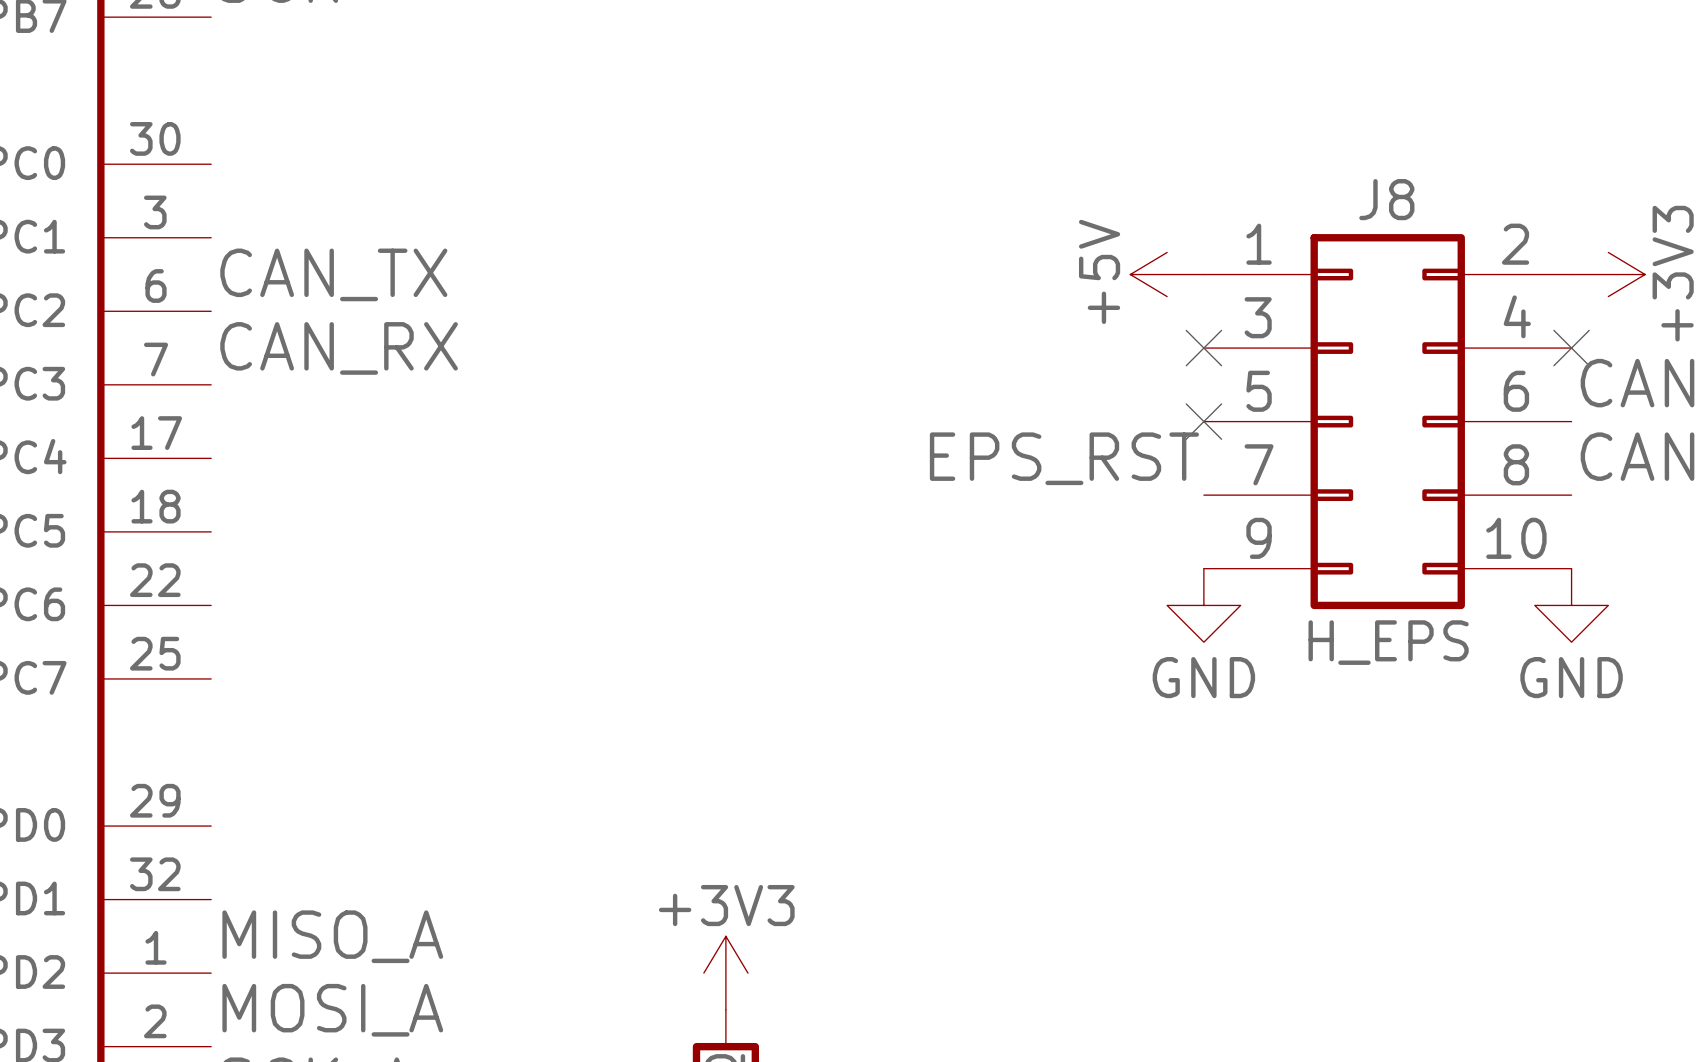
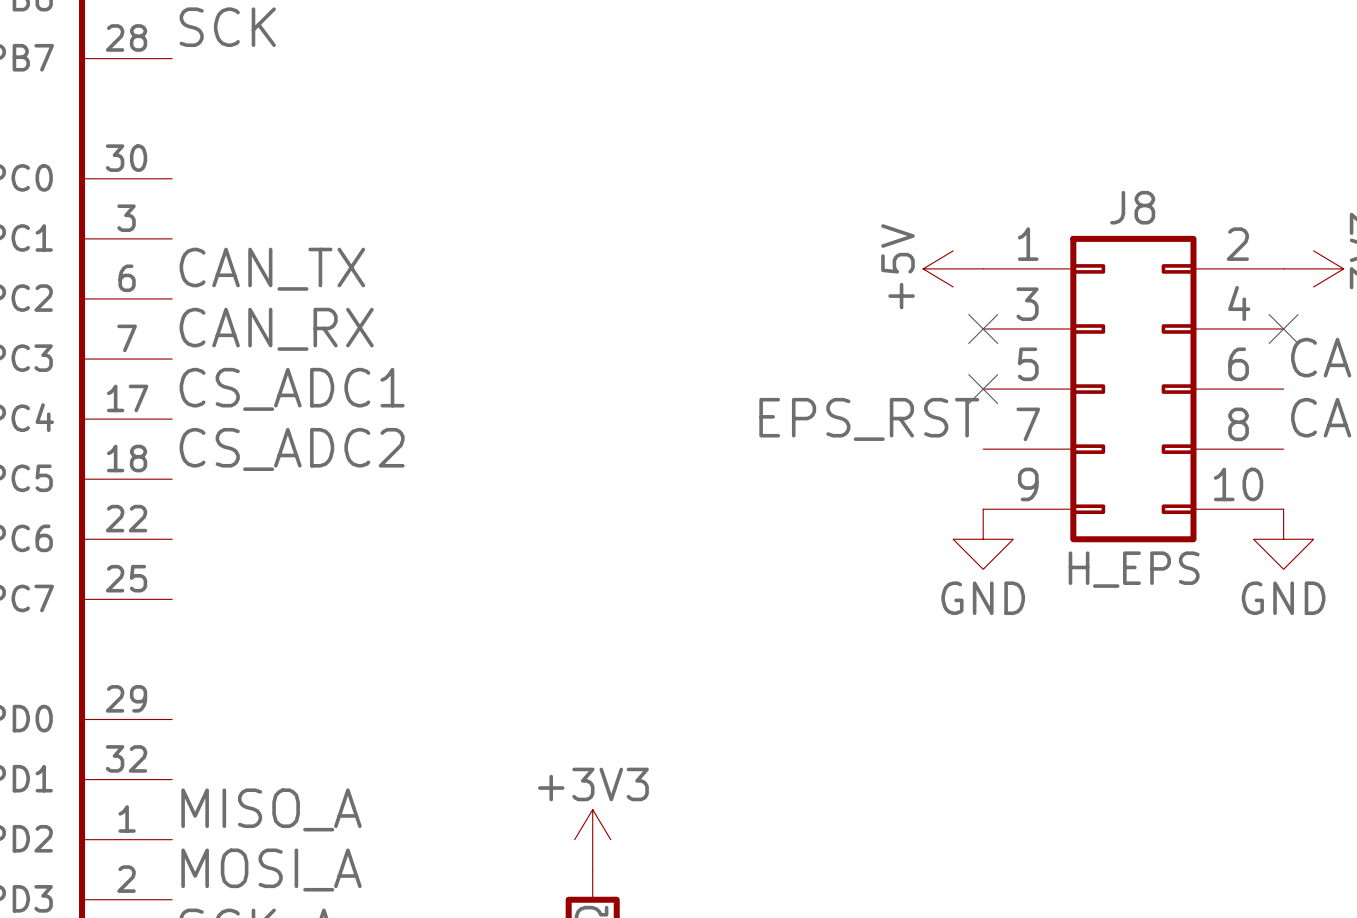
label: none -> CS_ADC1 (292, 389)
label: none -> CS_ADC2 (292, 449)

